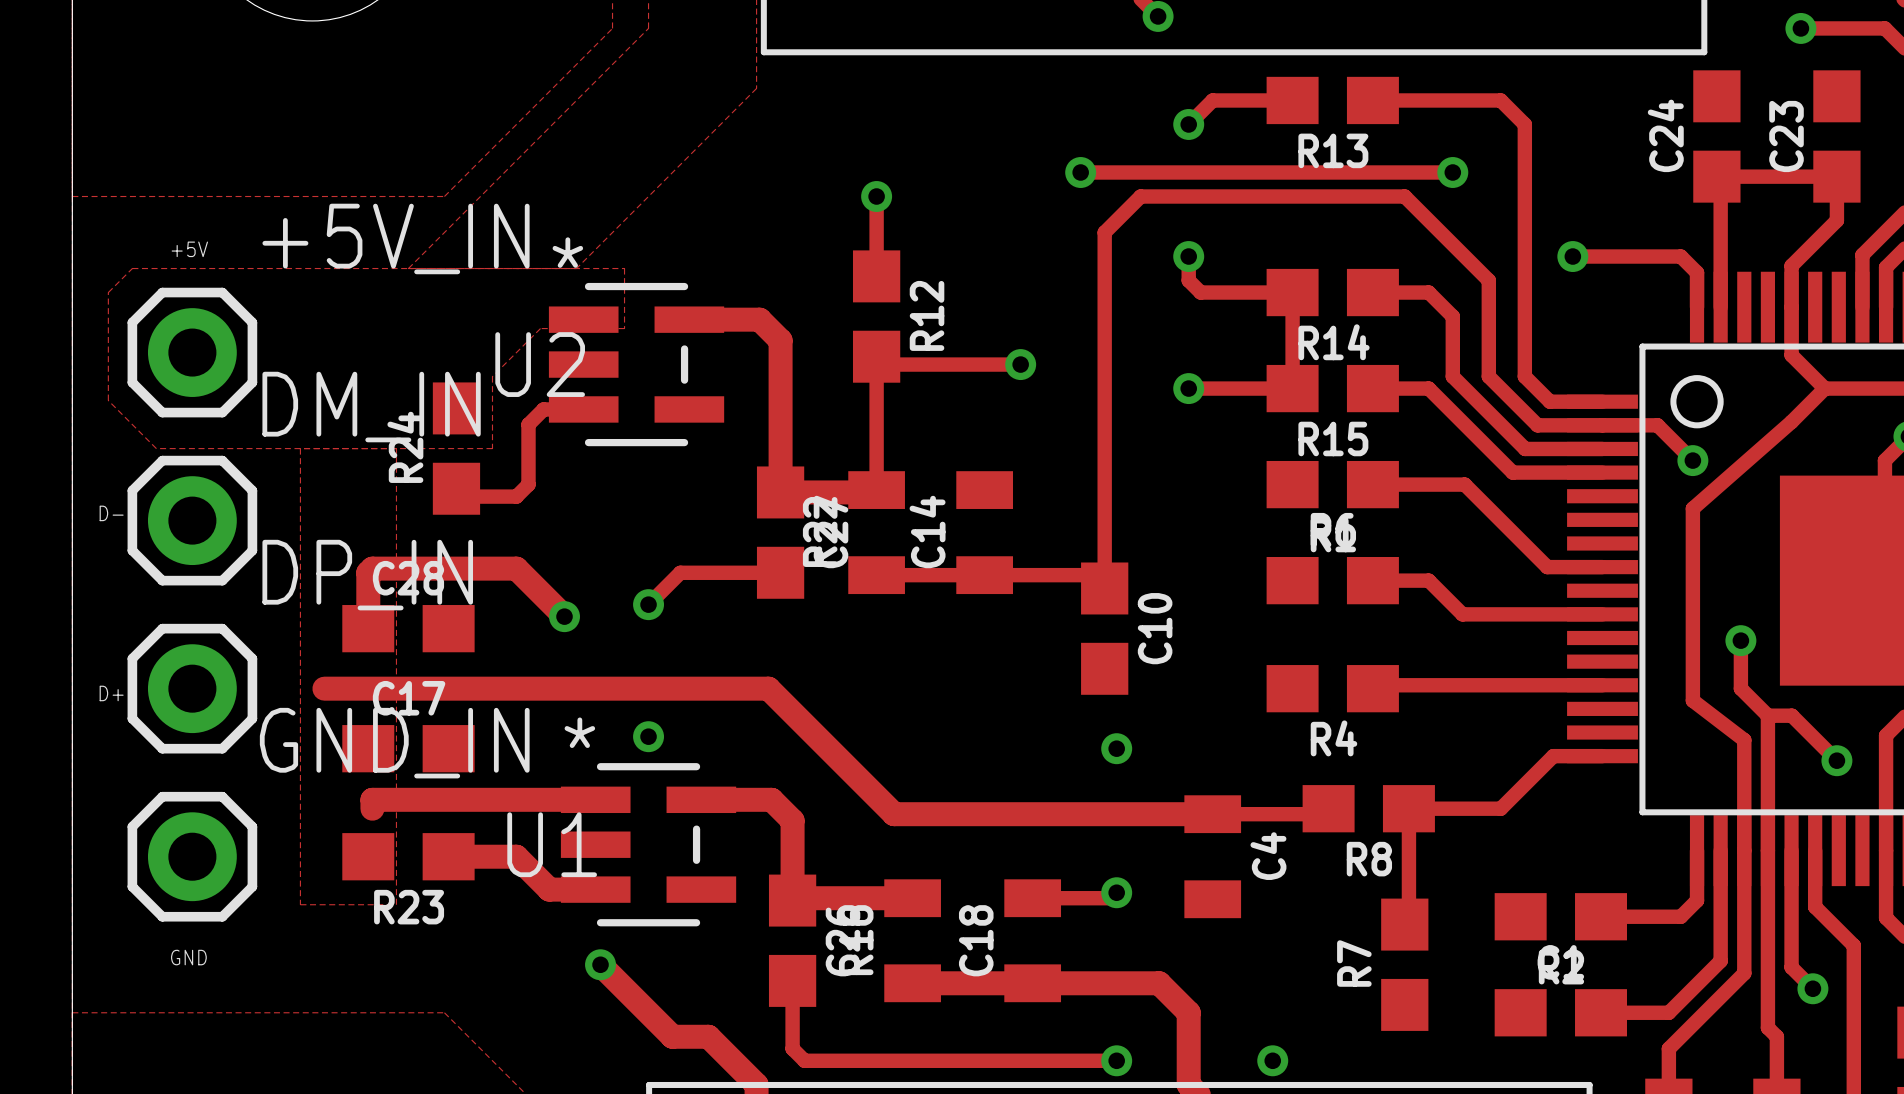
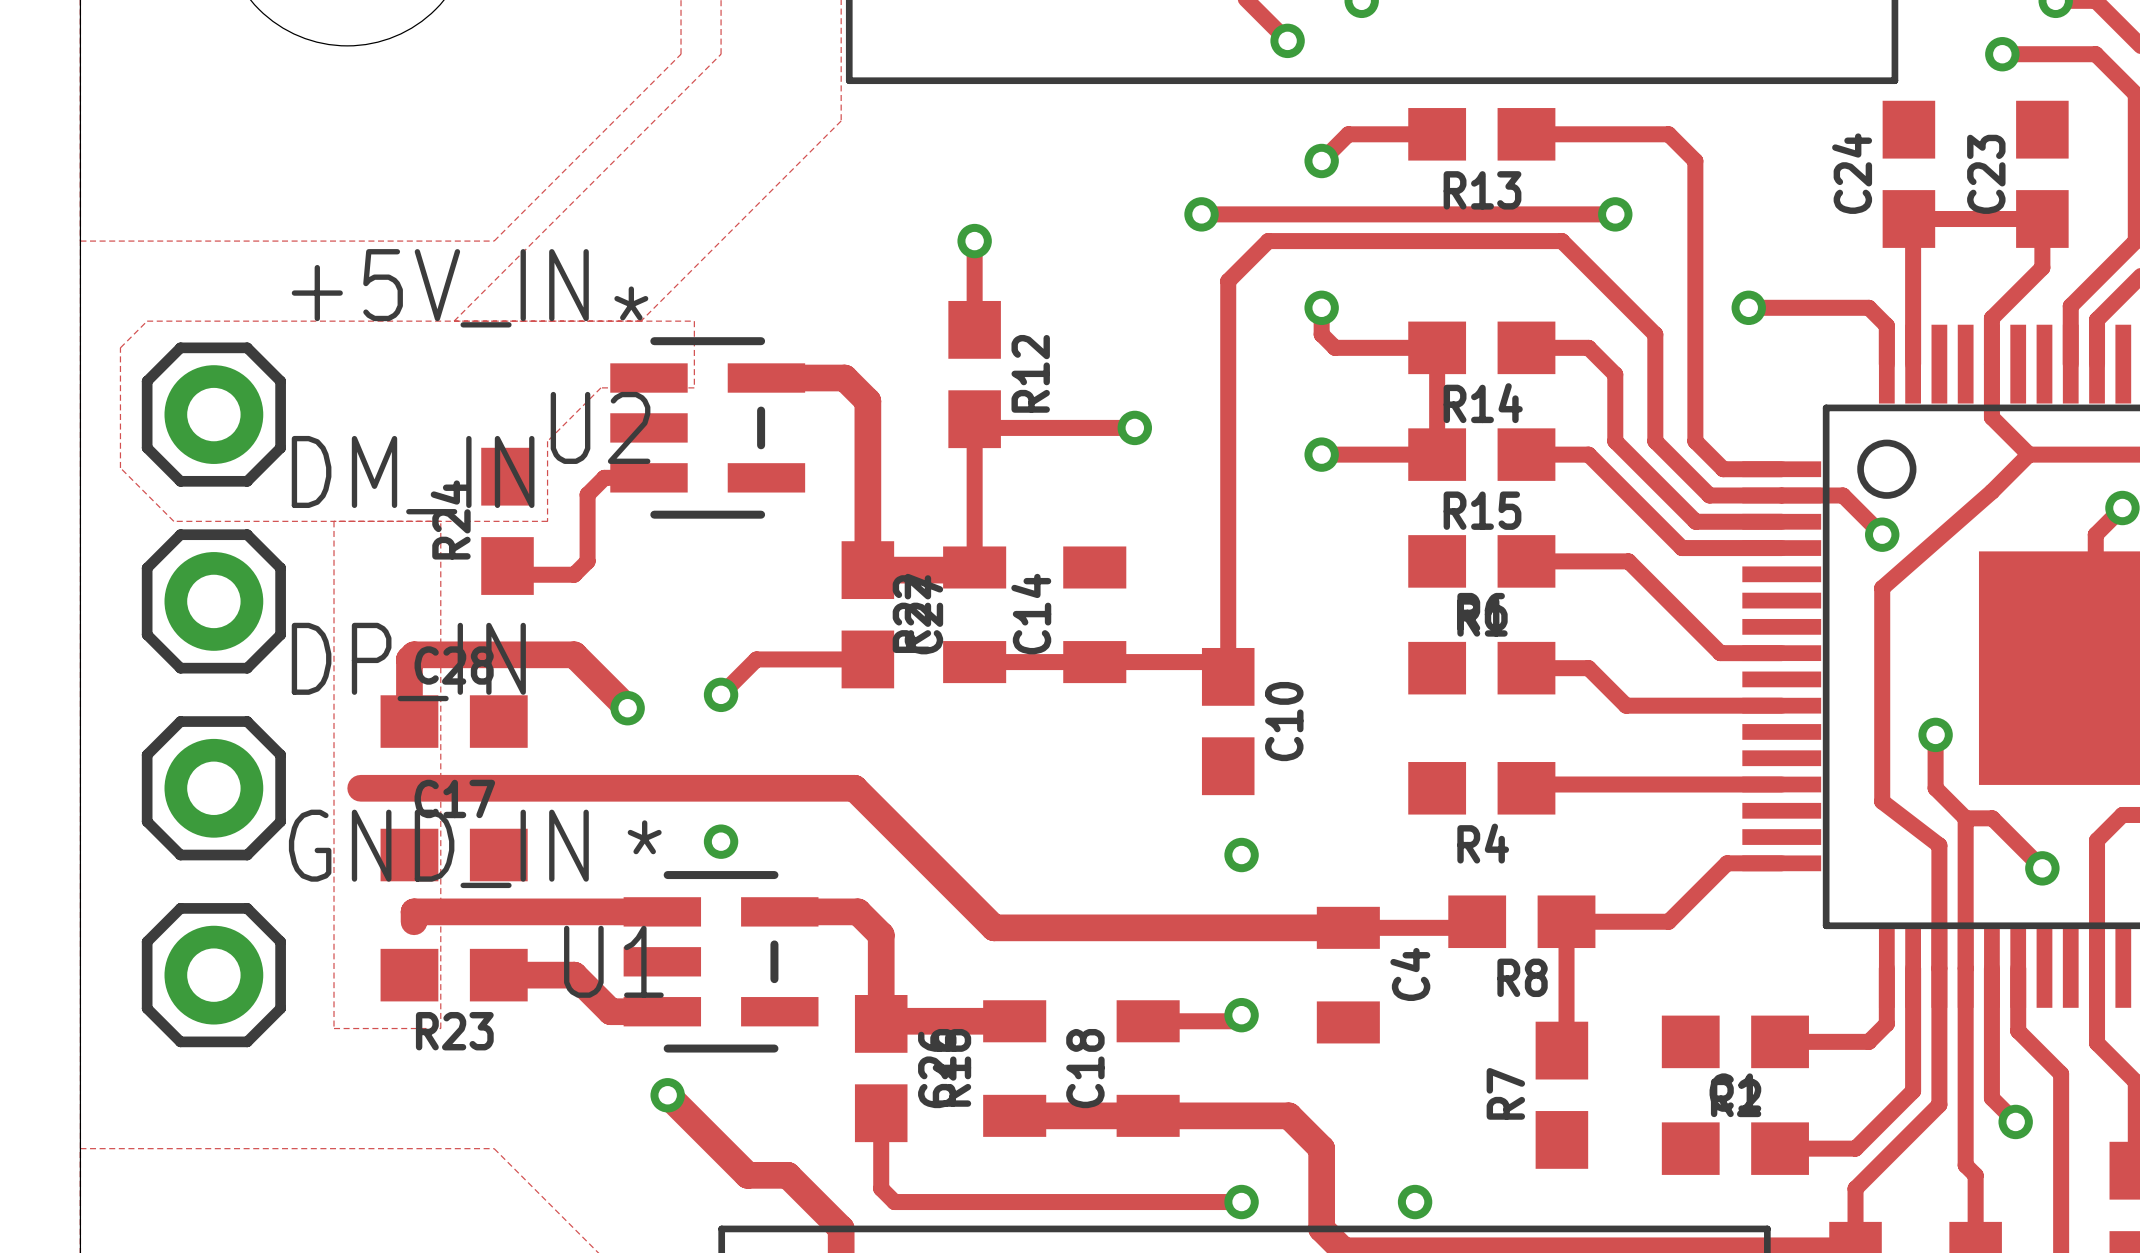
text: +5V (189, 249) -> none
text: D- (111, 513) -> none
text: D+ (111, 693) -> none
text: GND (188, 957) -> none

